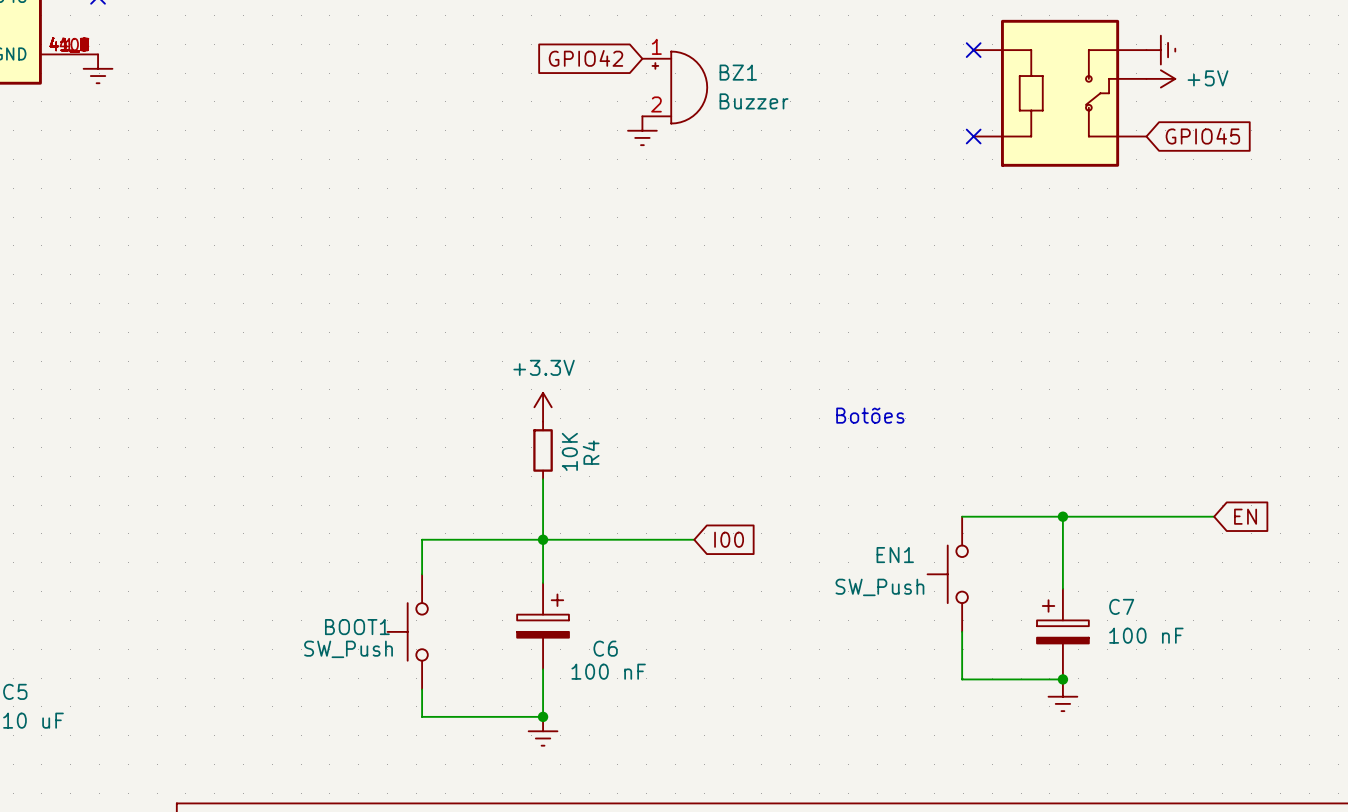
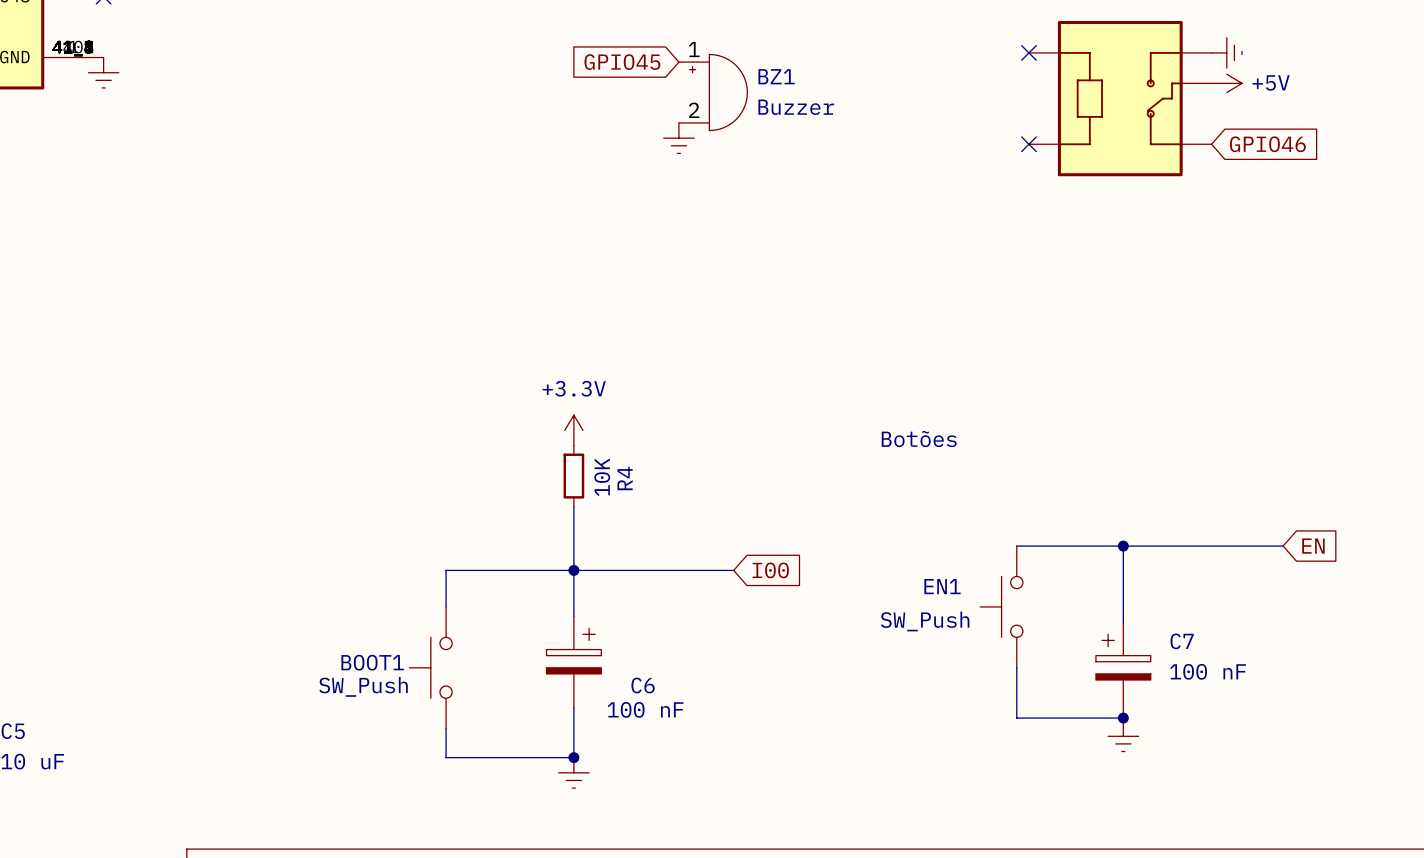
global label: GPIO42 (585, 58) -> GPIO45 (622, 62)
global label: GPIO45 (1202, 136) -> GPIO46 (1267, 144)

